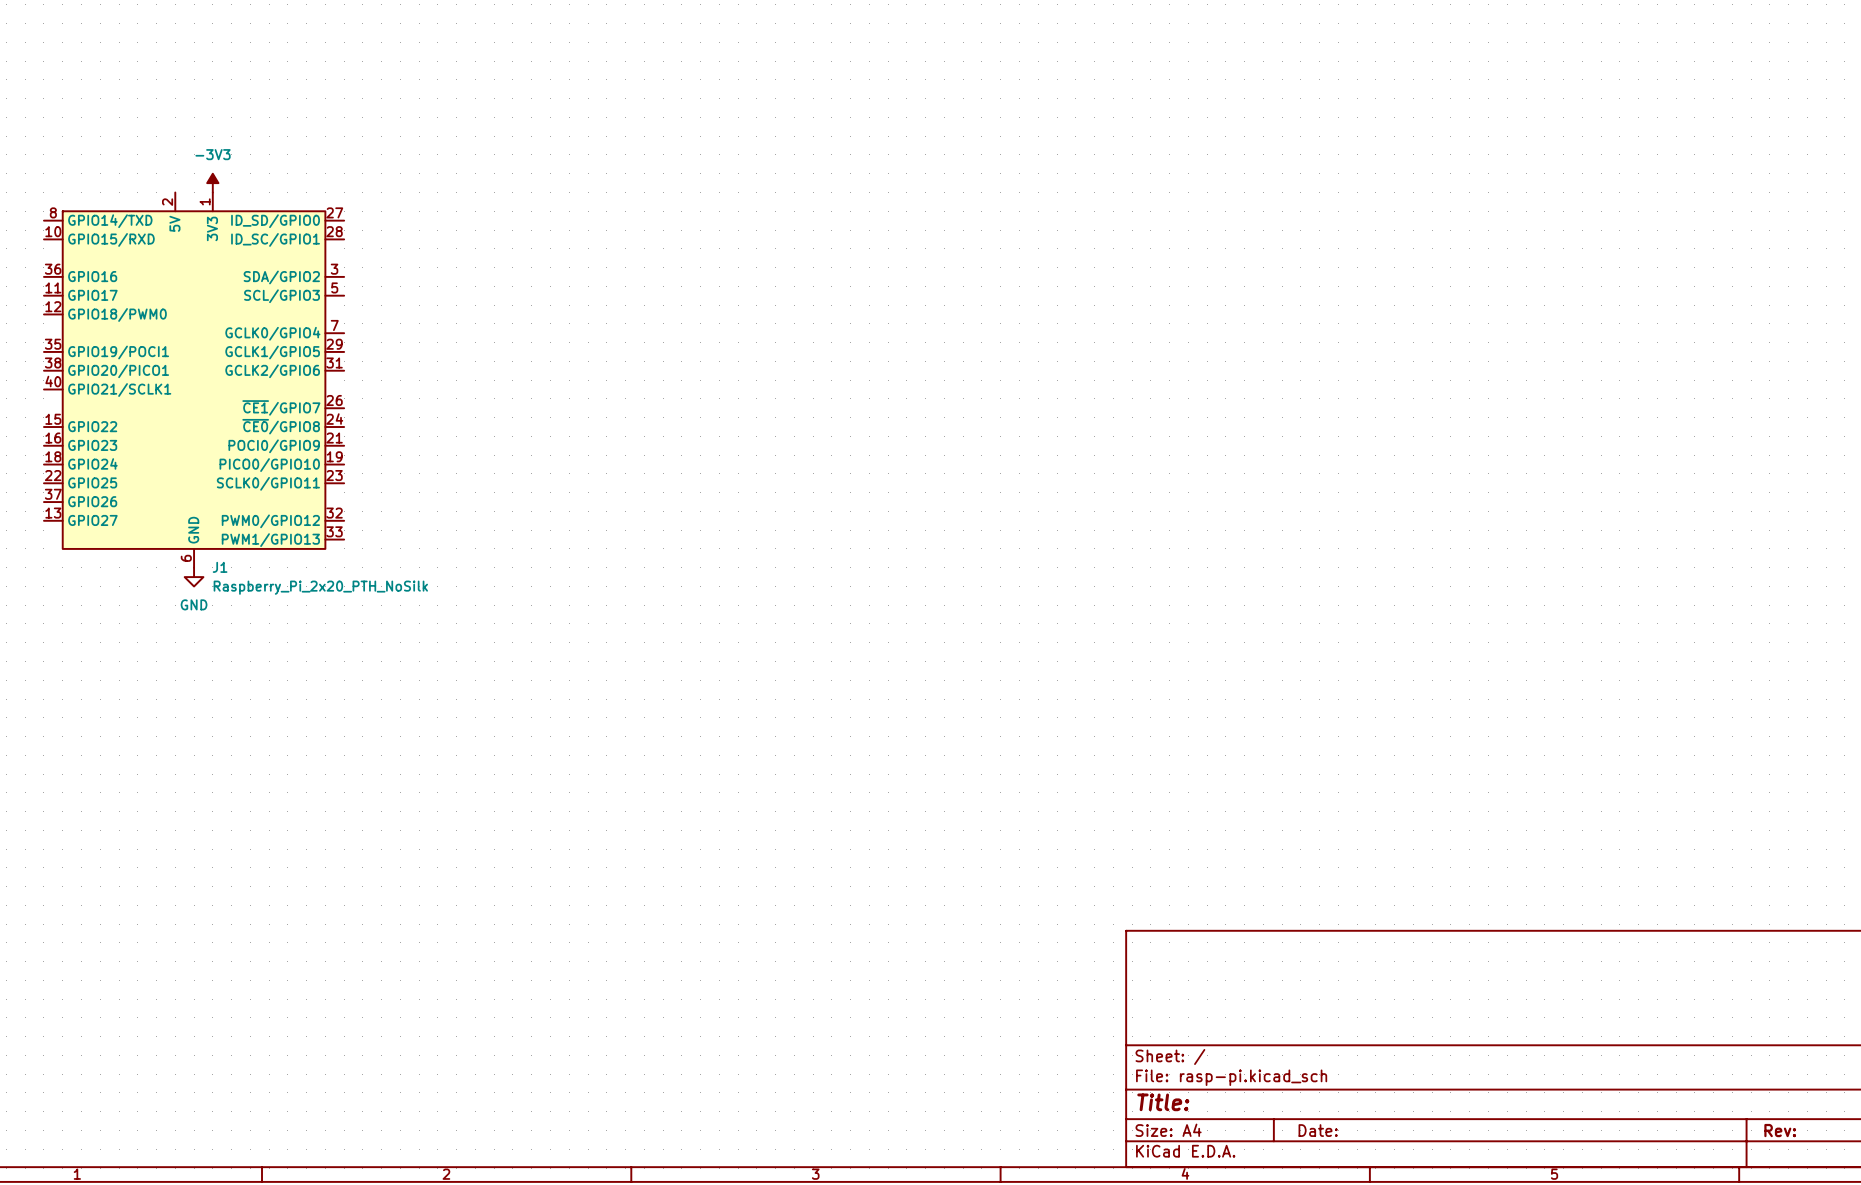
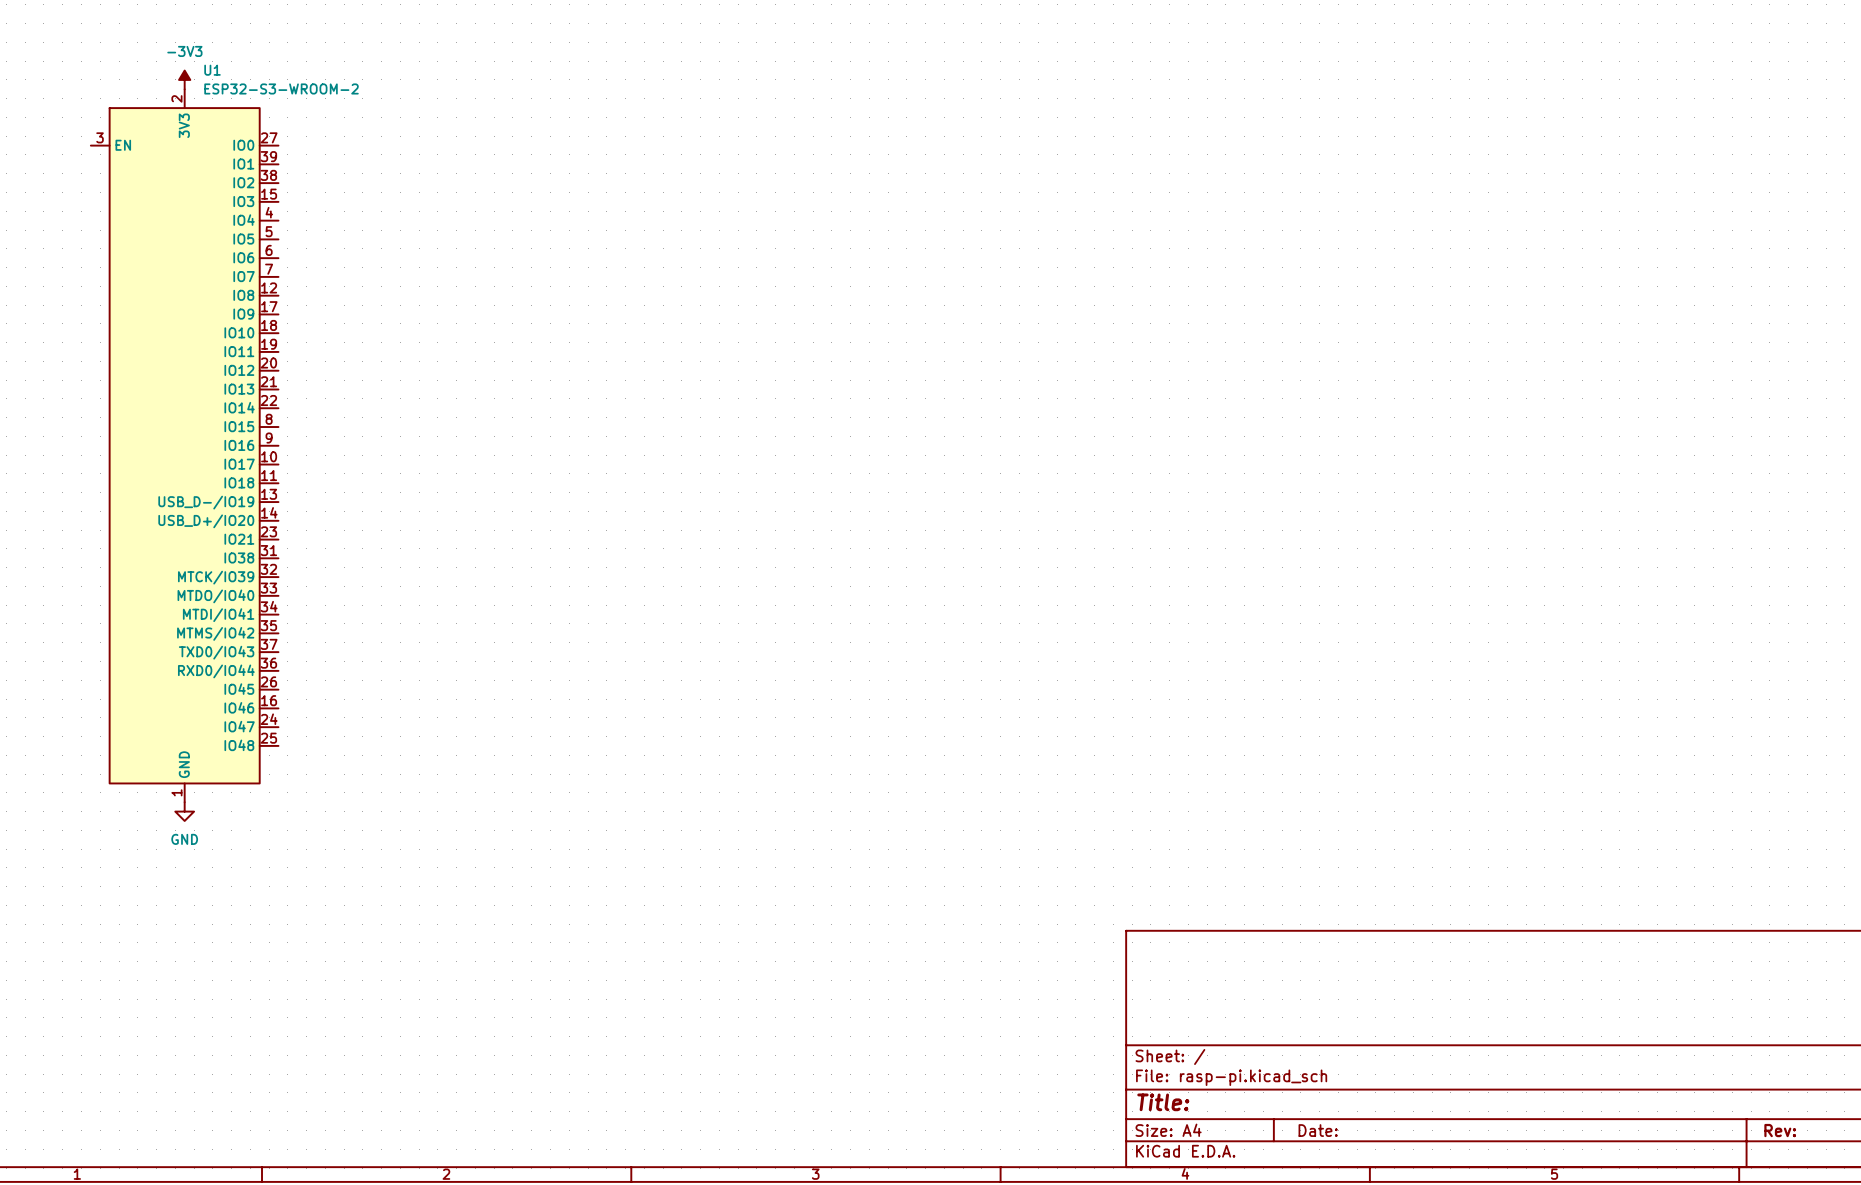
power symbol position: -3V3 (212, 183) -> -3V3 (184, 79)
J1: Raspberry_Pi_2x20_PTH_NoSilk (194, 380) -> none
U1: none -> ESP32-S3-WROOM-2 (184, 445)
power symbol: GND (194, 577) -> none
power symbol: none -> GND (184, 811)

